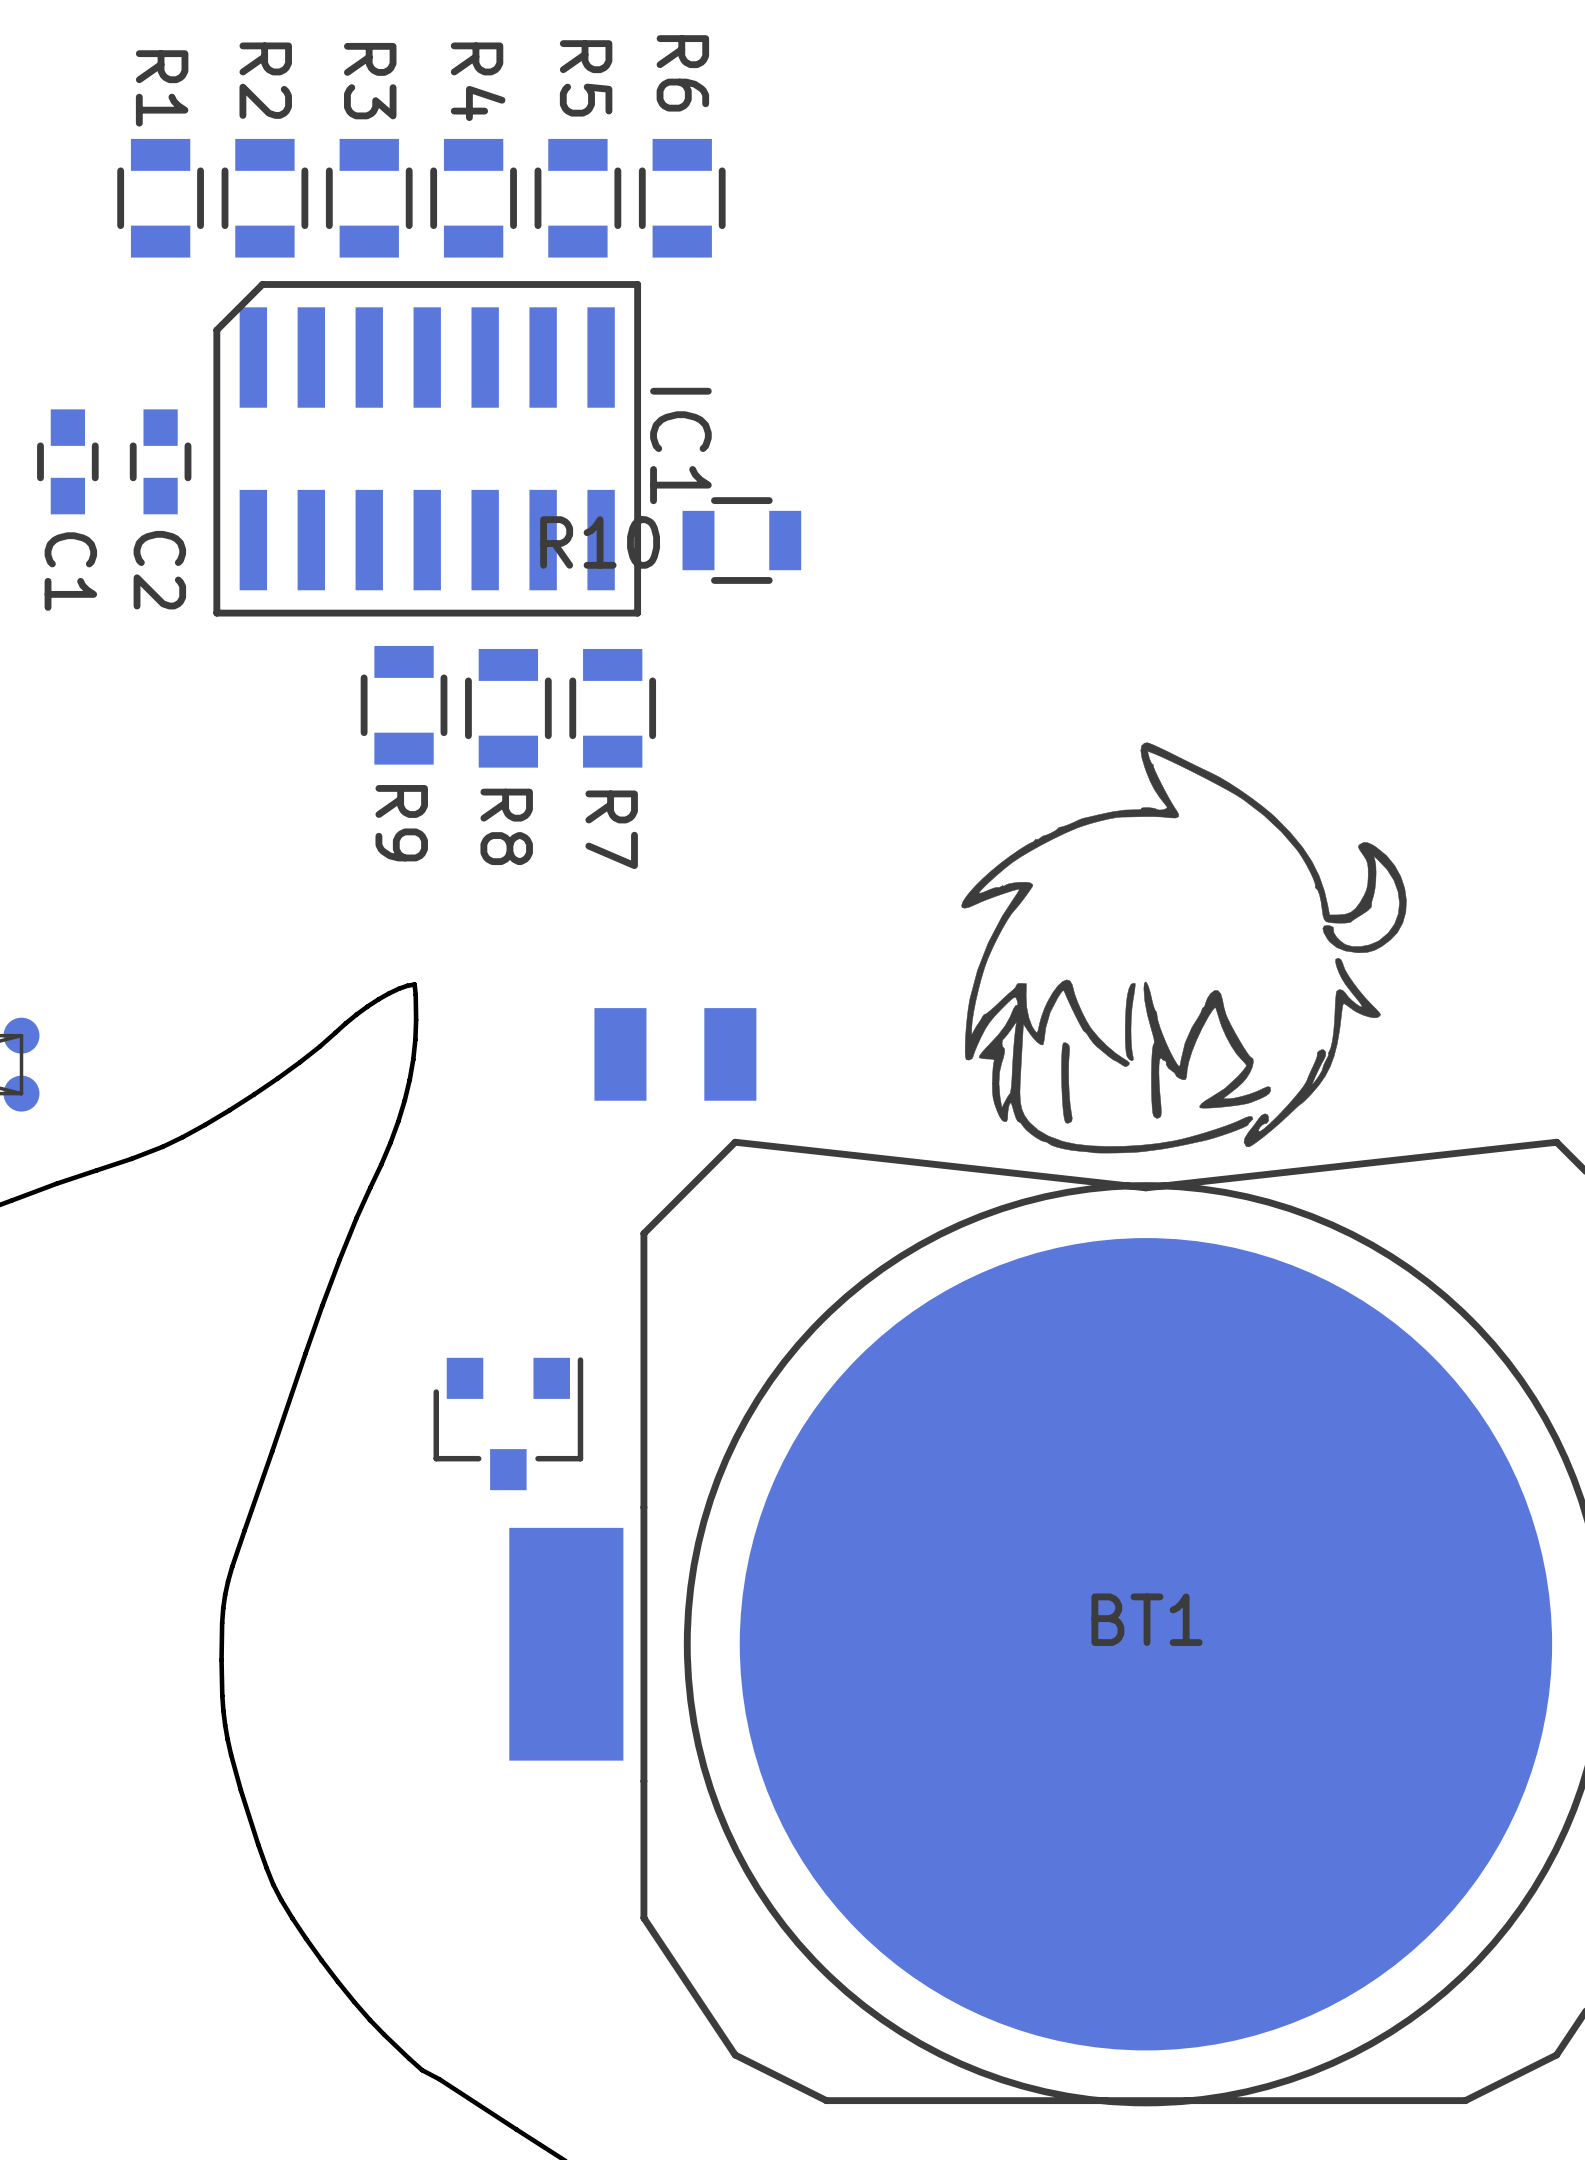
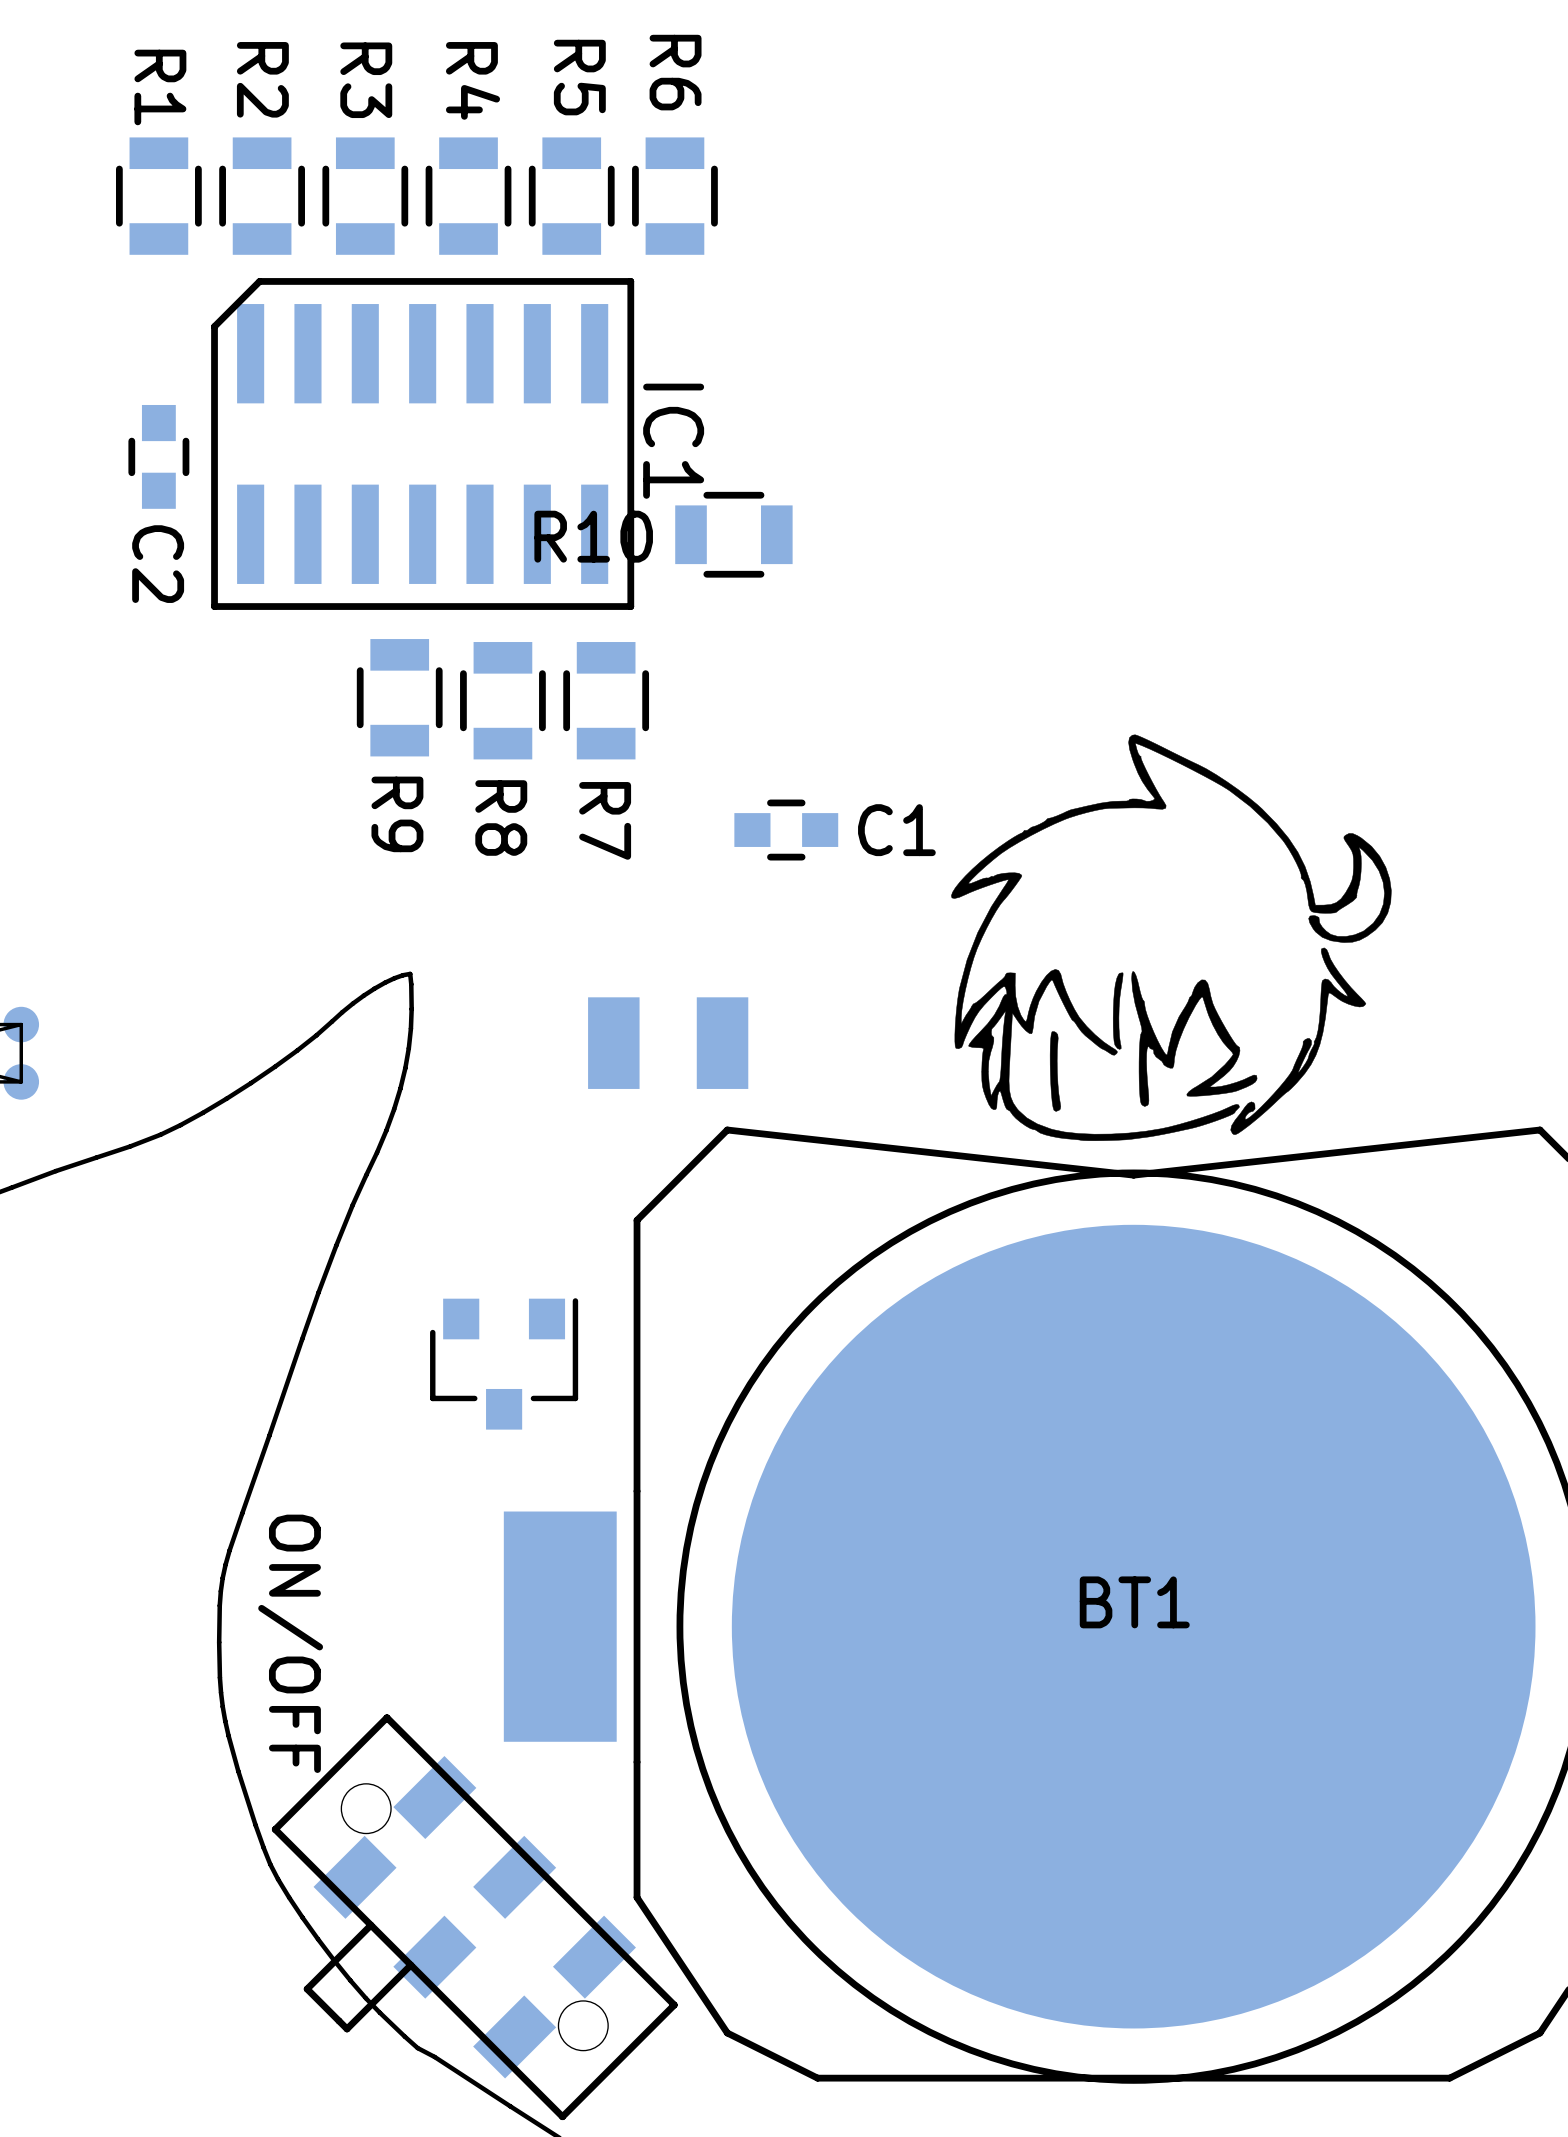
C1 rotation: 0° (67, 461) -> 90° clockwise (786, 830)
C1 position: (67, 461) -> (786, 830)
C1 name position: C1 (70, 571) -> C1 (896, 830)
part position: (508, 1423) -> (504, 1363)
ON/OFF: none -> (474, 1917)

